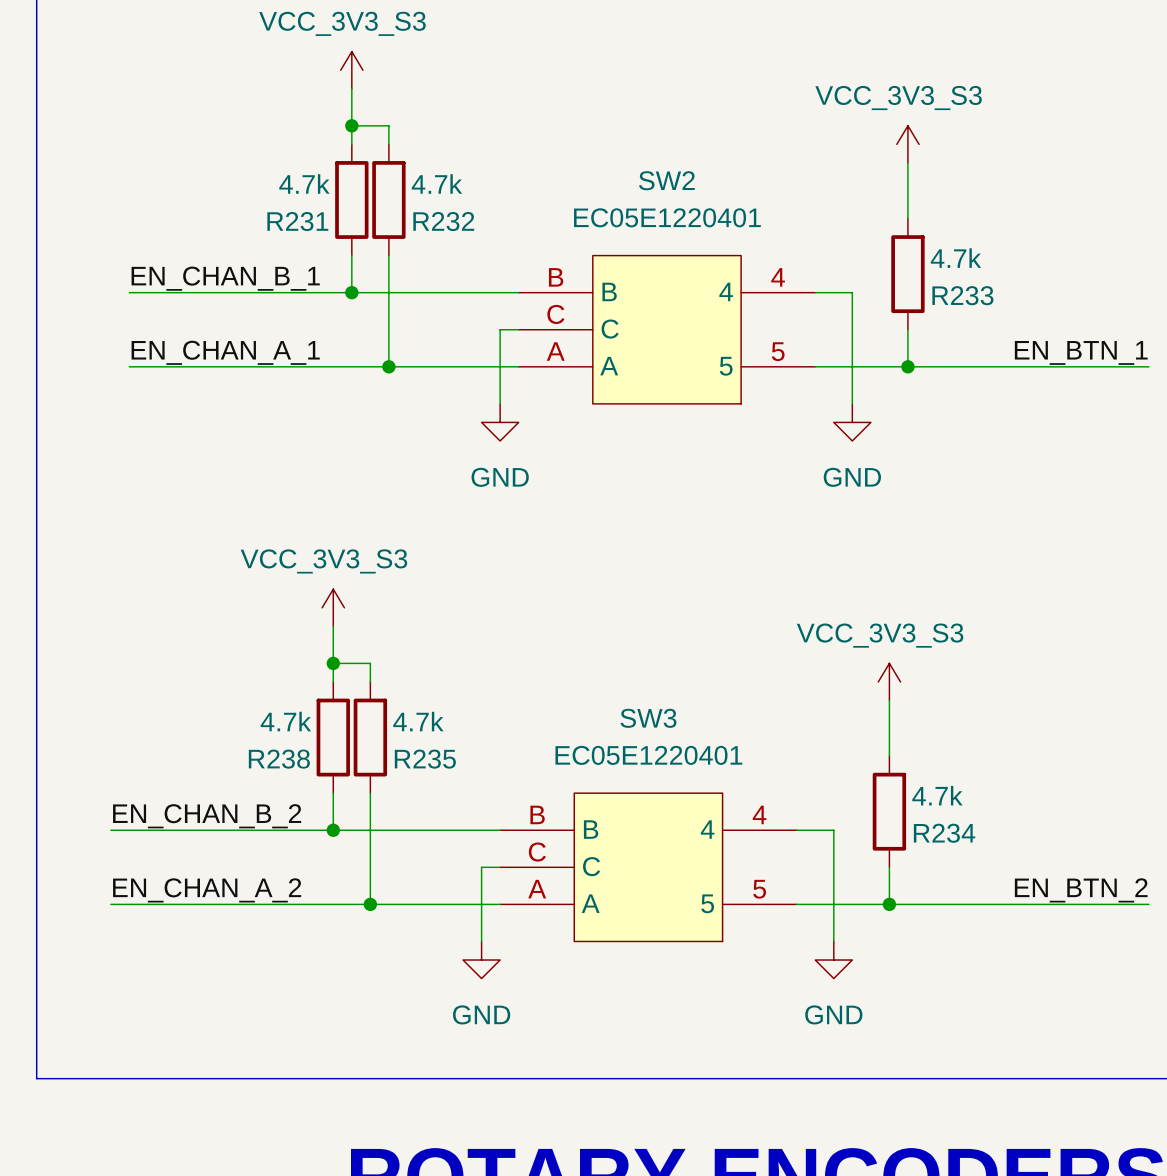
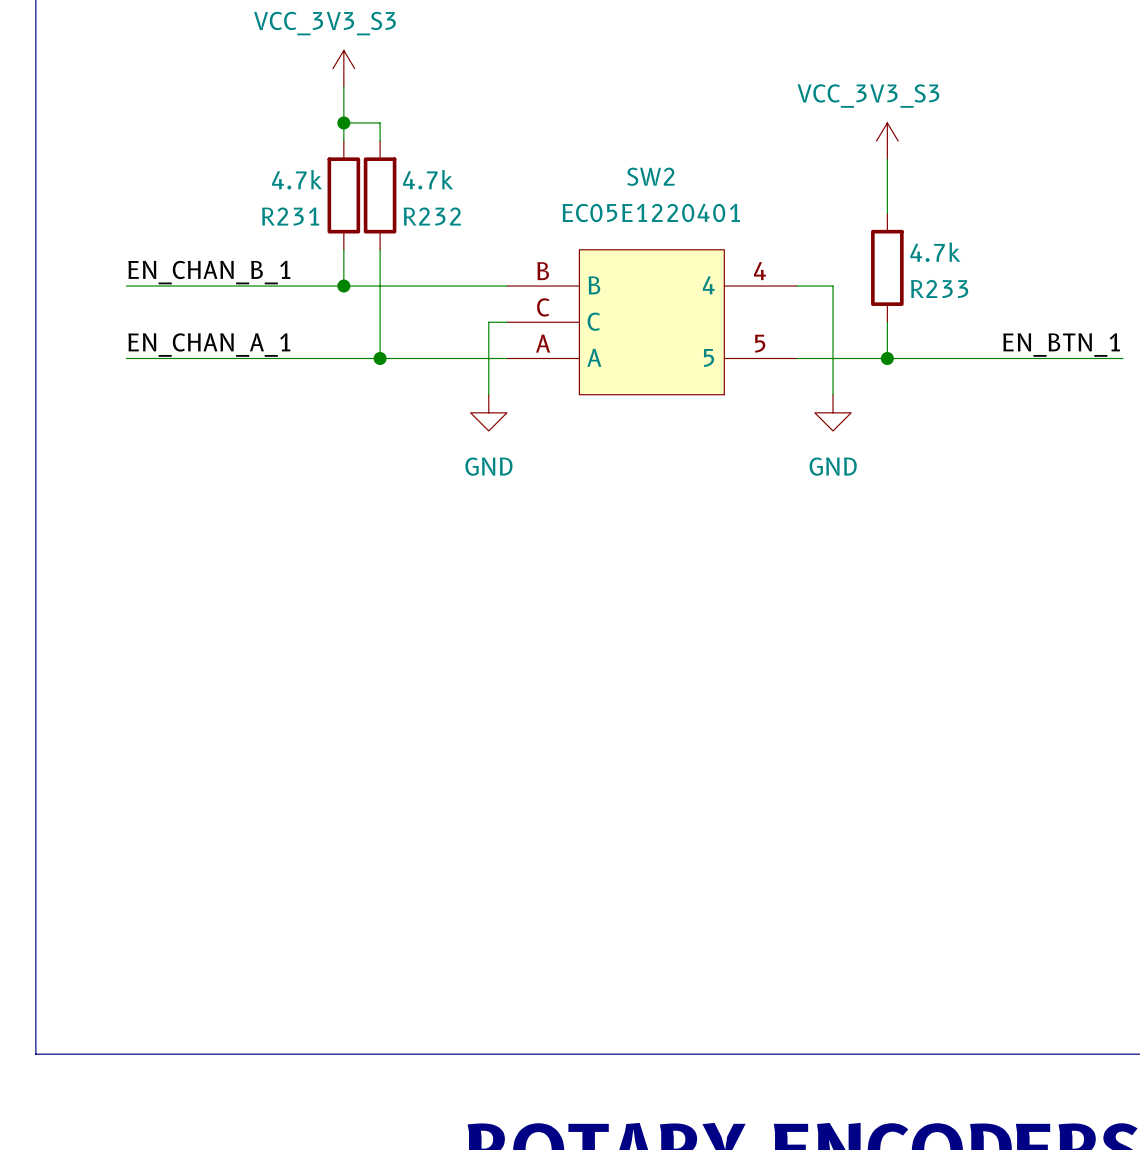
power symbol: VCC_3V3_S3 (333, 607) -> none
wire: (333, 626) (333, 681) -> none
wire: (333, 663) (370, 663) (370, 681) -> none
junction: (333, 663) -> none
power symbol: VCC_3V3_S3 (889, 681) -> none
wire: (889, 700) (889, 756) -> none
R238: 4.7k (333, 737) -> none
R235: 4.7k (370, 737) -> none
wire: (333, 793) (333, 830) -> none
wire: (370, 793) (370, 904) -> none
R234: 4.7k (889, 811) -> none
label: EN_CHAN_B_2 (207, 816) -> none
wire: (110, 830) (500, 830) -> none
junction: (333, 830) -> none
wire: (796, 830) (833, 830) (833, 941) -> none
wire: (500, 867) (481, 867) (481, 941) -> none
SW3: EC05E1220401 (648, 867) -> none
wire: (889, 867) (889, 904) -> none
label: EN_CHAN_A_2 (207, 890) -> none
label: EN_BTN_2 (1081, 890) -> none
wire: (110, 904) (500, 904) -> none
junction: (370, 904) -> none
wire: (796, 904) (1148, 904) -> none
junction: (889, 904) -> none
power symbol: GND (481, 960) -> none
power symbol: GND (833, 960) -> none

